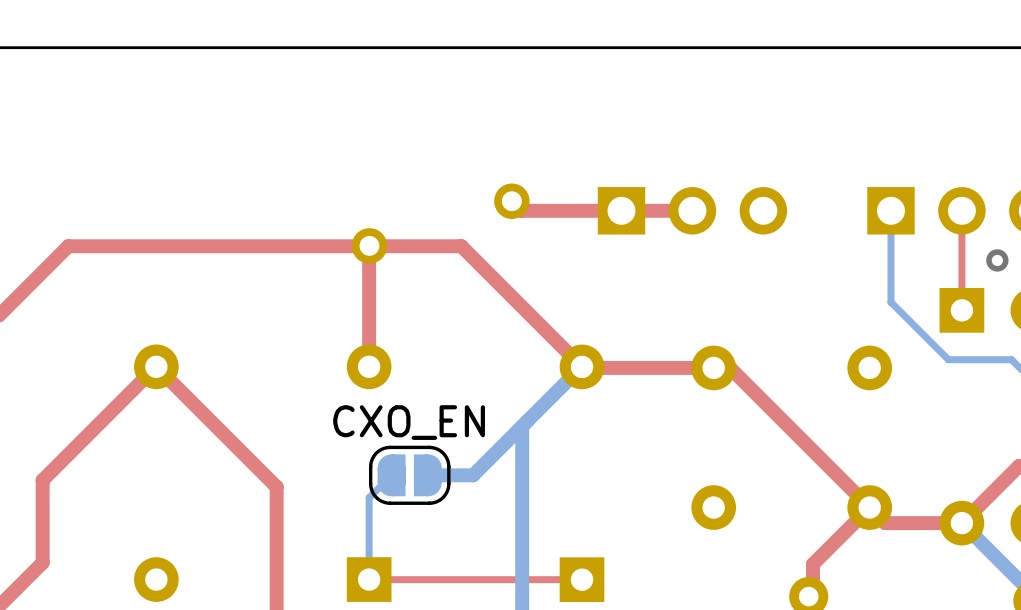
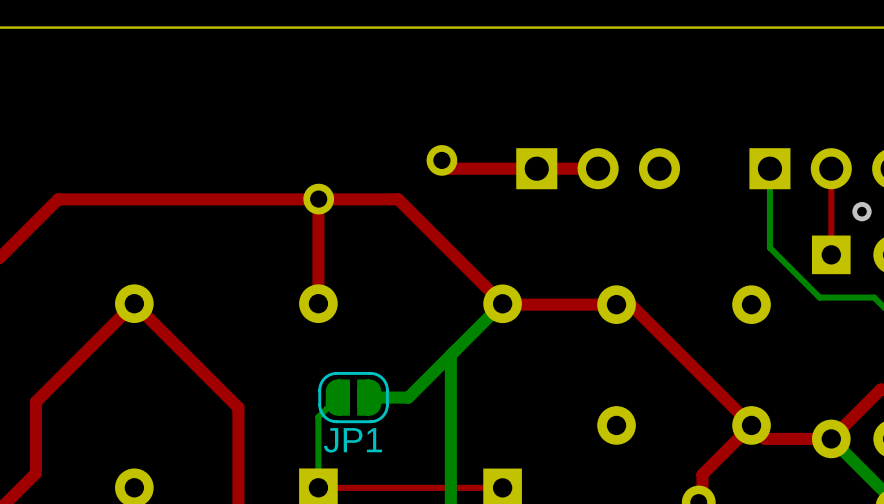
JP1 value: CXO_EN (409, 422) -> none
JP1 name: none -> JP1 (352, 440)

